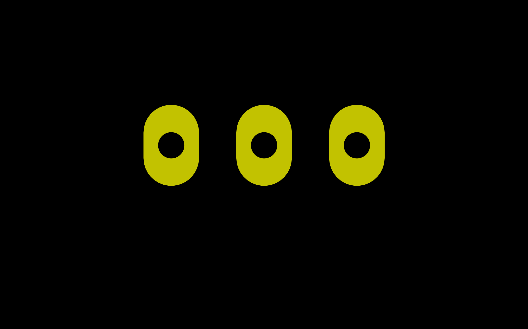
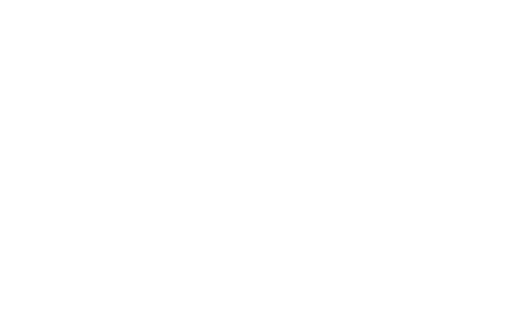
part: (264, 145) -> none

